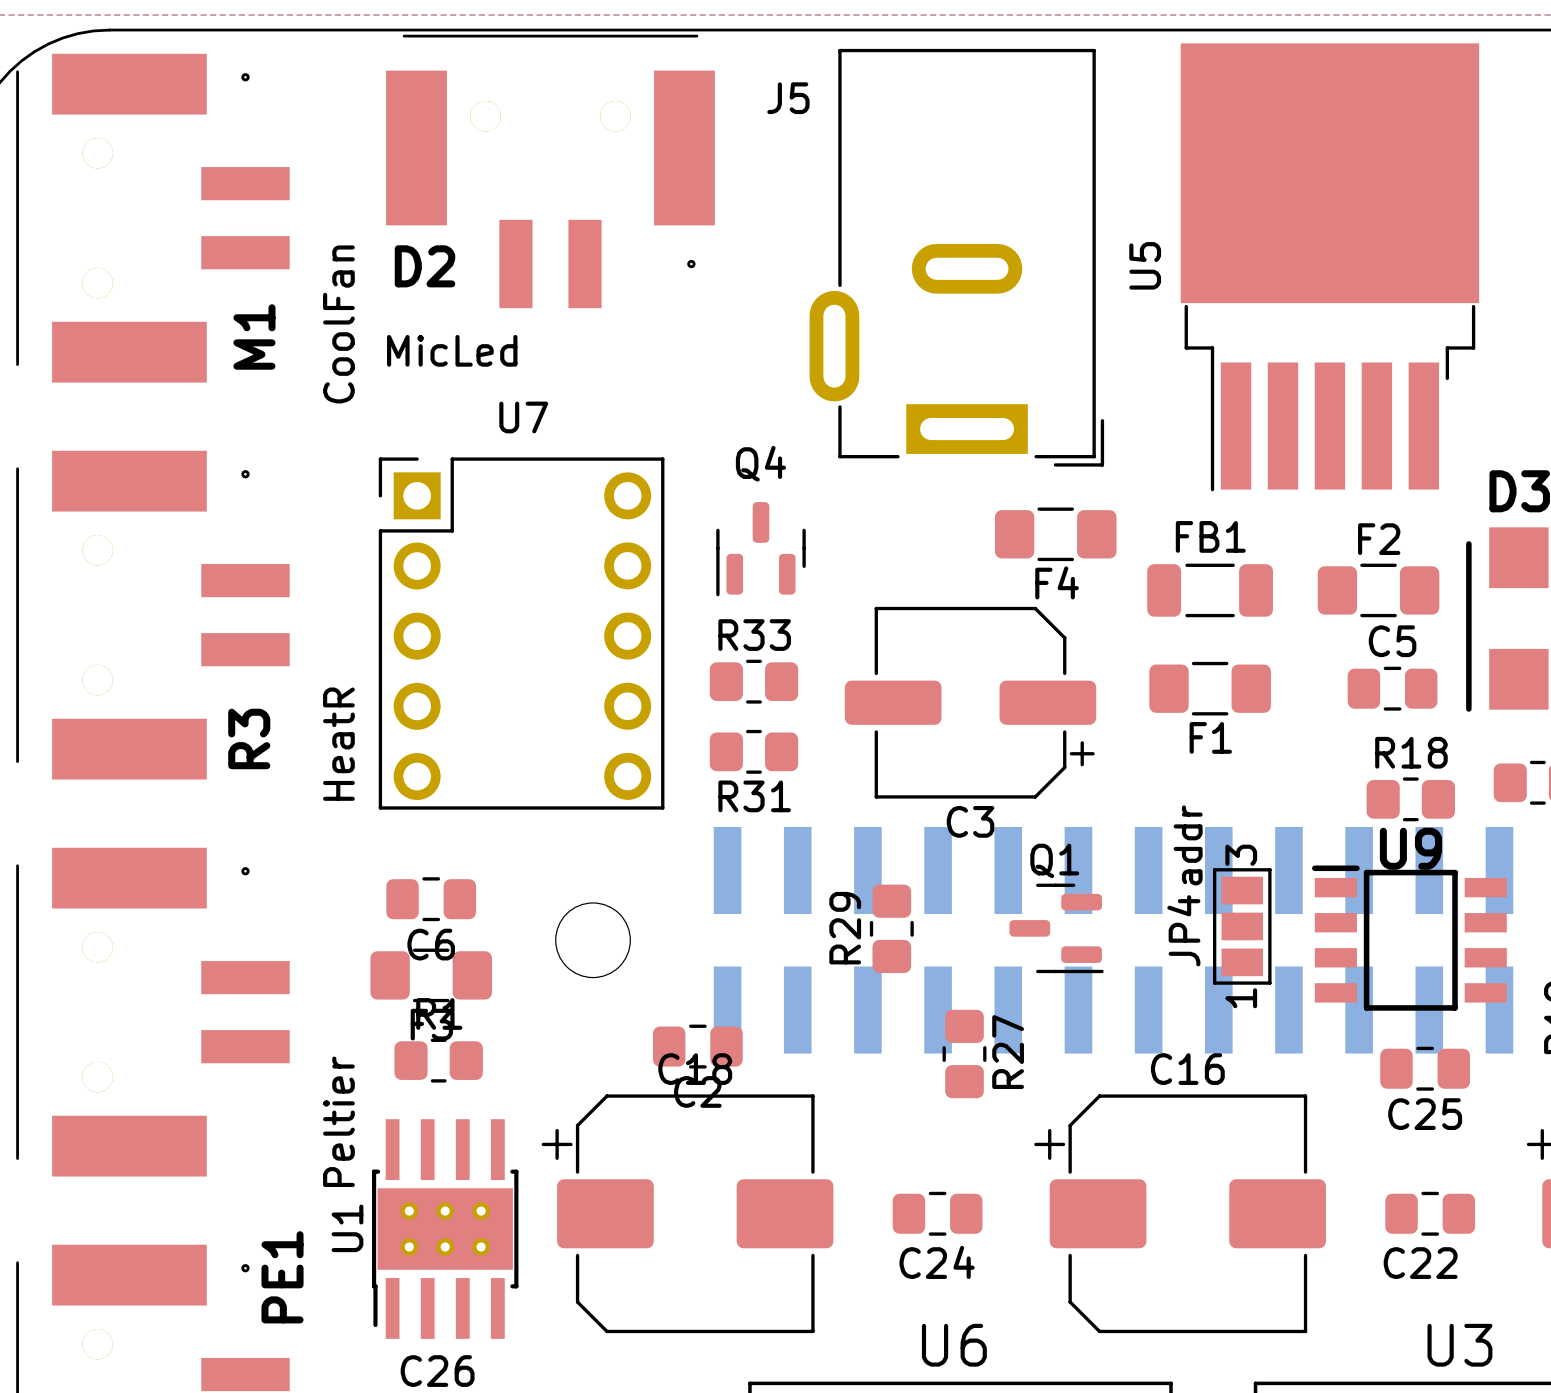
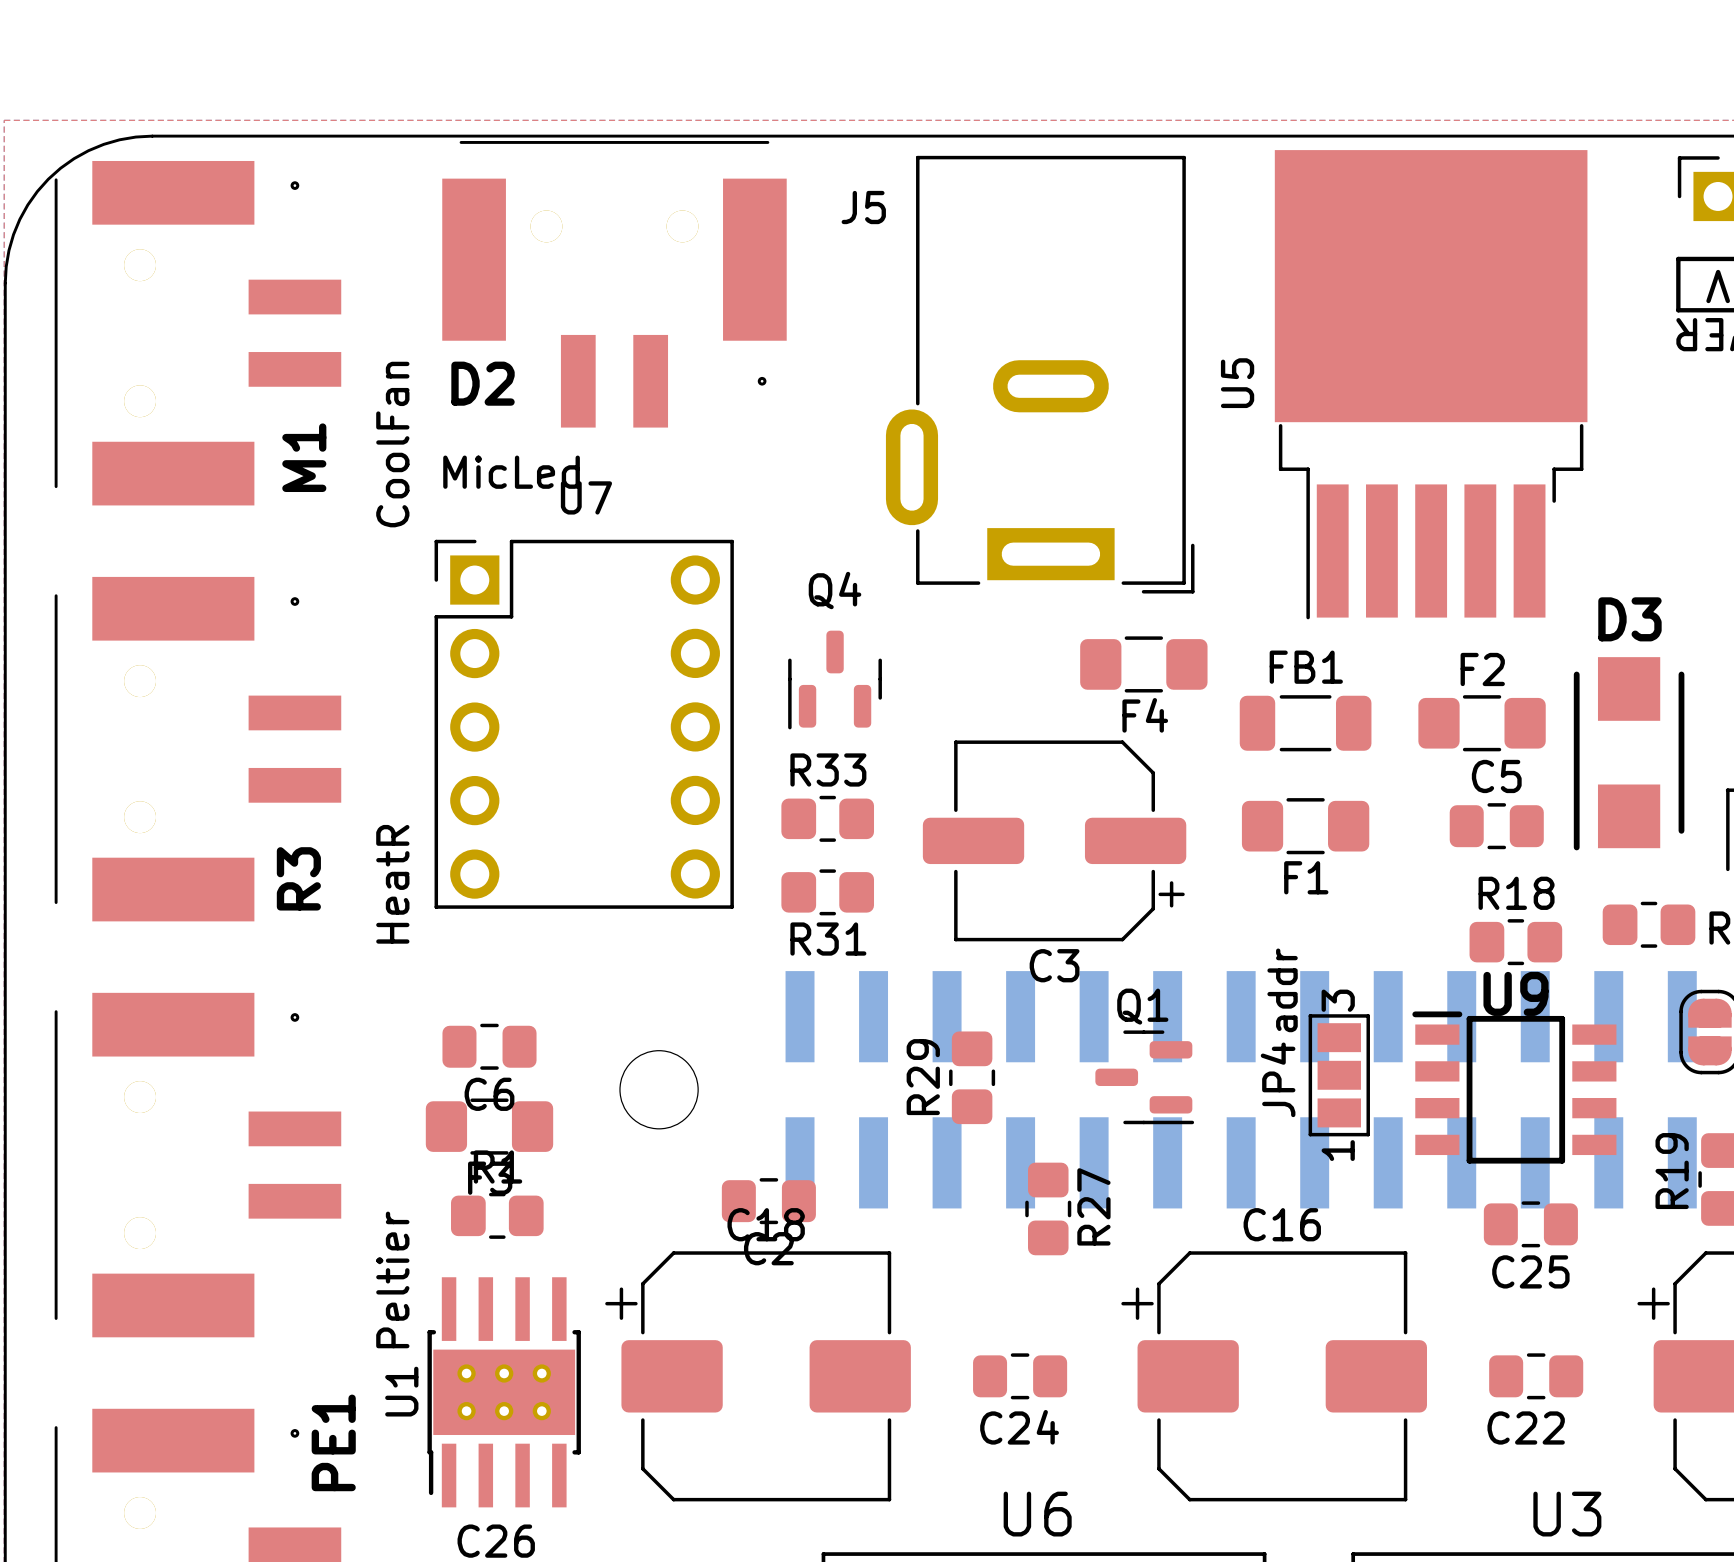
U7 position: (521, 633) -> (584, 724)

